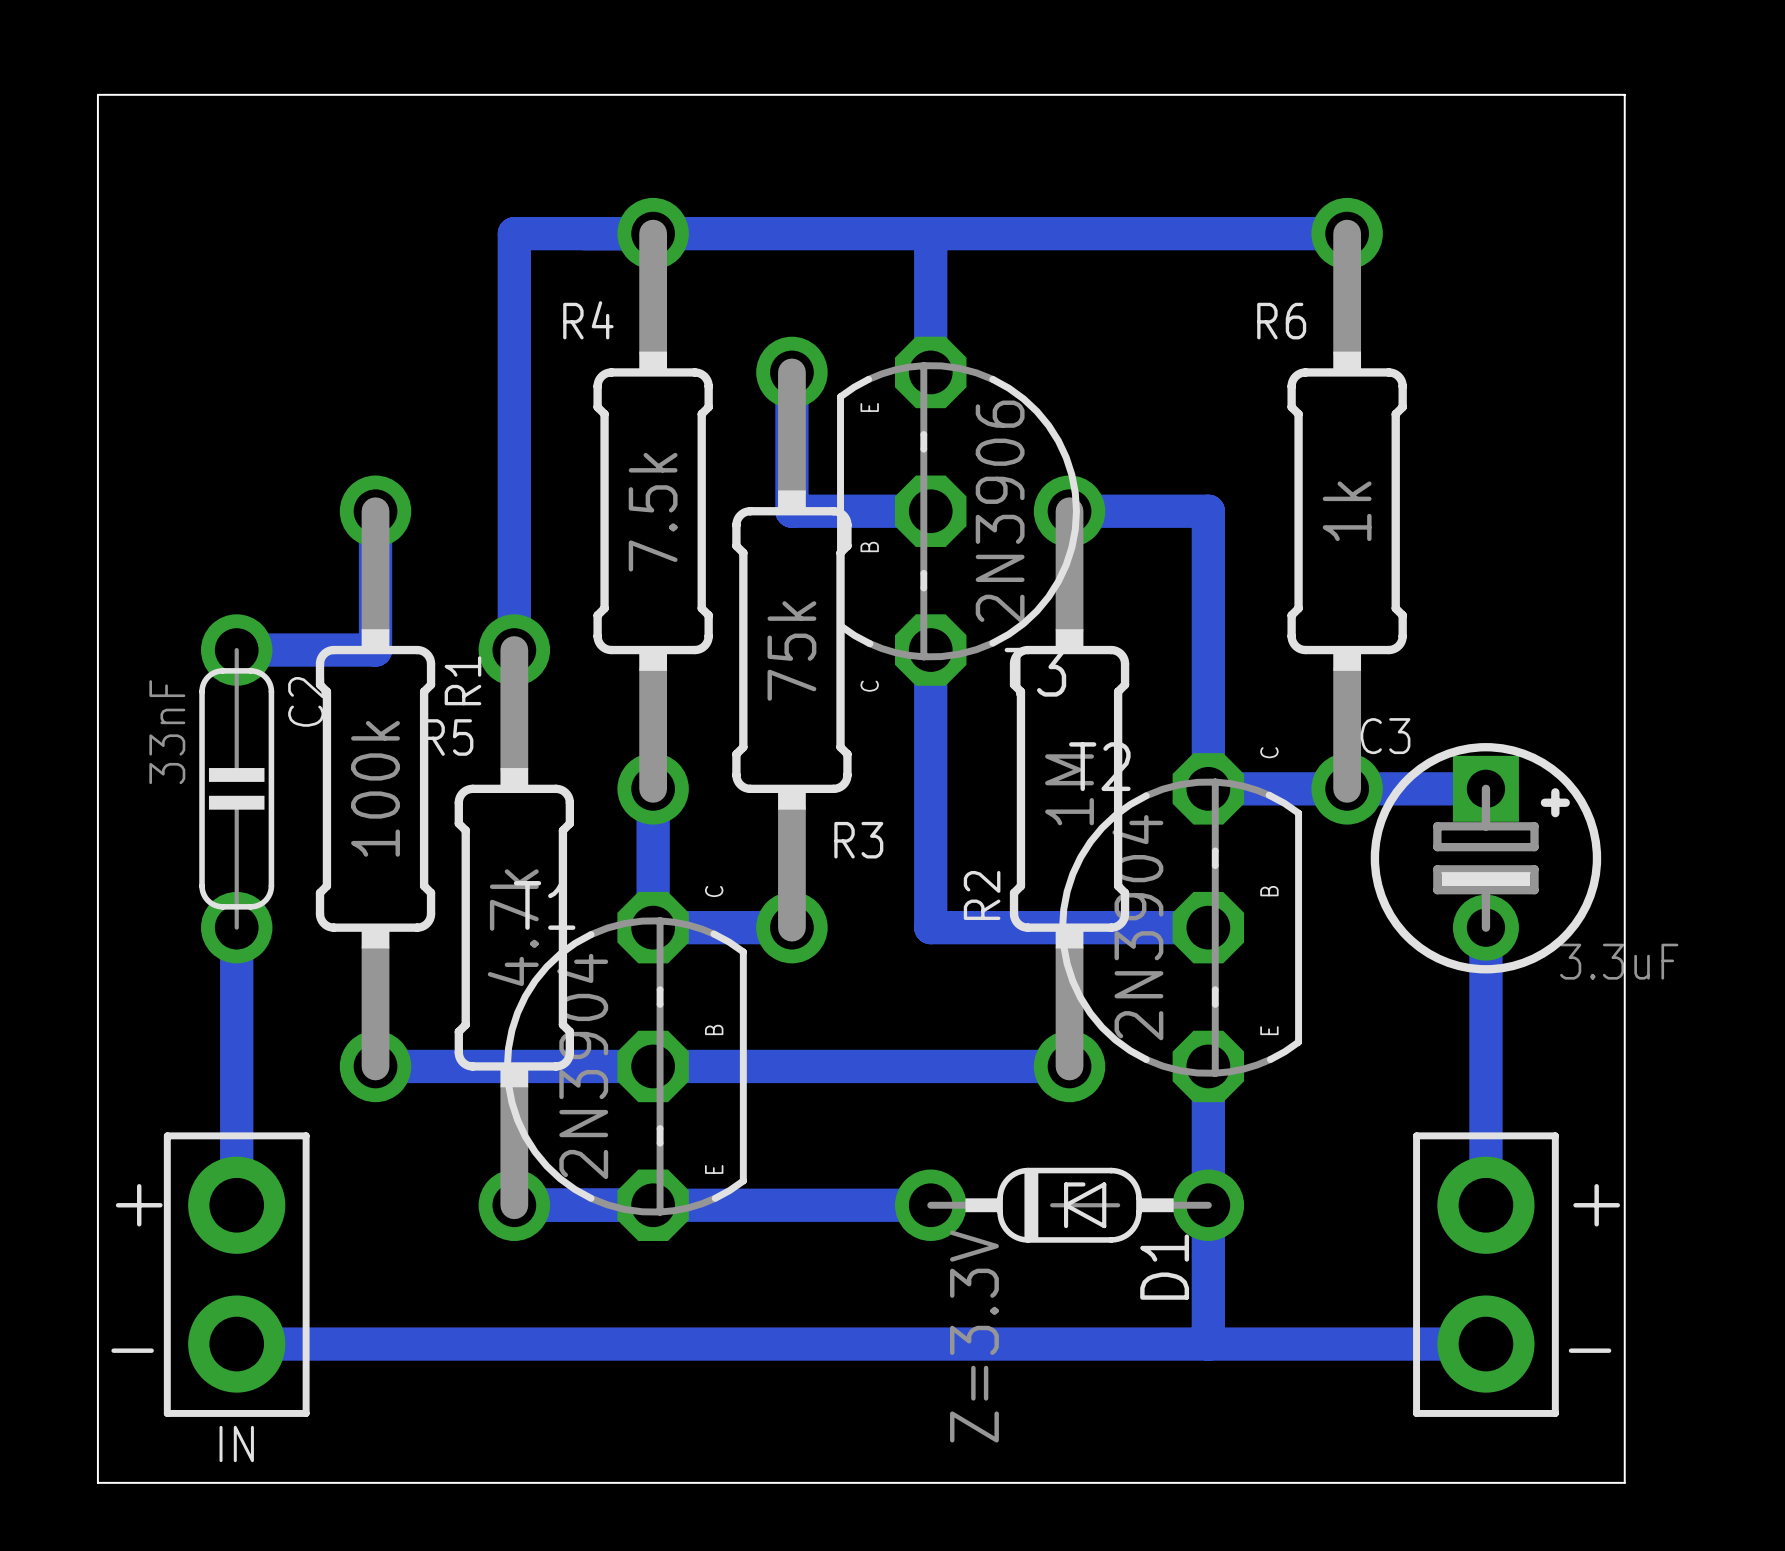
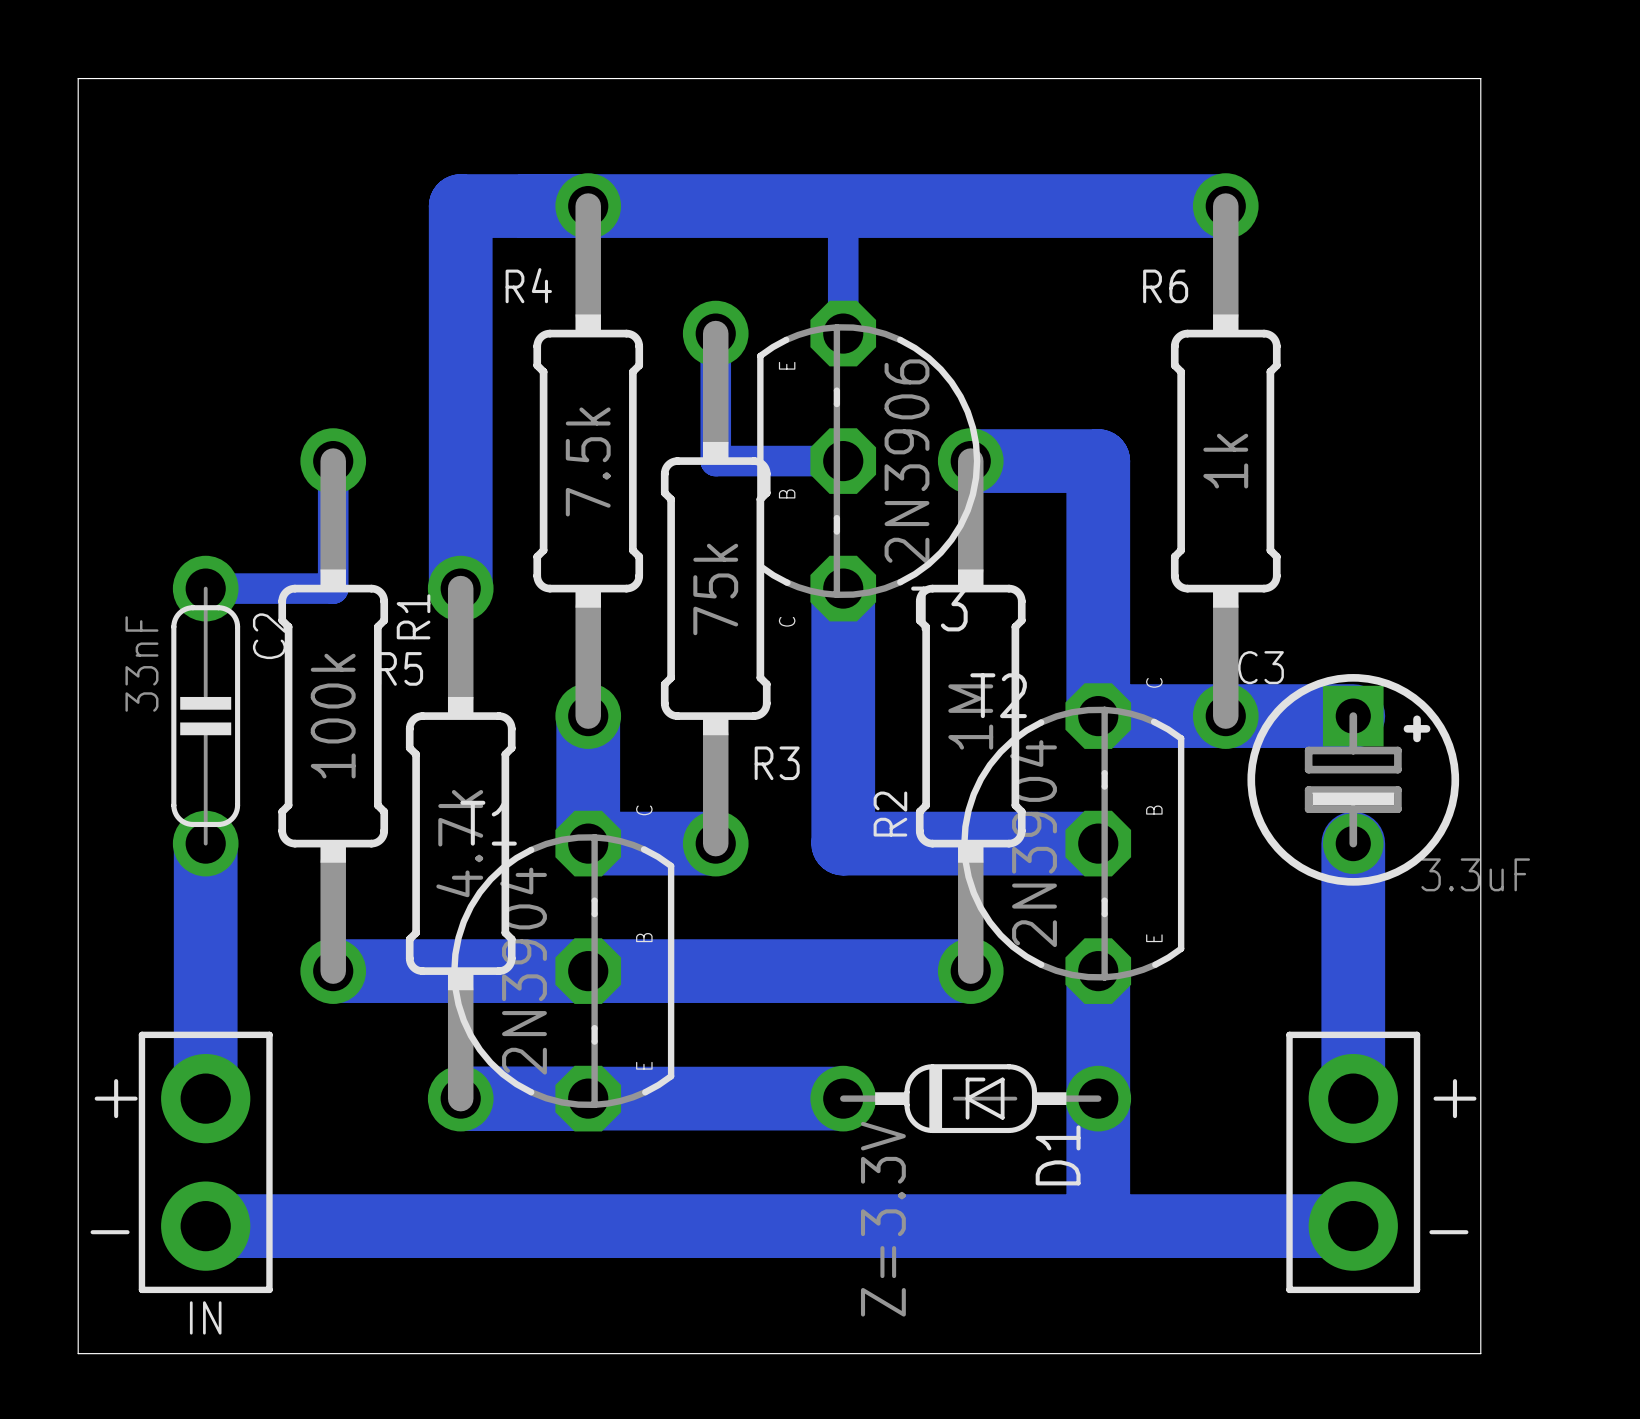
bottom track width: thin (1347, 233) (514, 233) (514, 650) -> thick (1225, 206) (460, 206) (460, 588)
bottom track width: thin (1069, 511) (1208, 511) (1208, 788) (1485, 788) -> thick (970, 461) (1098, 461) (1098, 716) (1353, 716)
bottom track width: thin (930, 650) (930, 927) (1208, 927) -> thick (843, 588) (843, 843) (1098, 843)
bottom track width: thin (653, 788) (653, 927) (791, 927) -> thick (588, 716) (588, 843) (715, 843)
bottom track width: thin (236, 927) (236, 1205) -> thick (205, 843) (205, 1098)
bottom track width: thin (1485, 927) (1485, 1205) -> thick (1353, 843) (1353, 1098)
bottom track width: thin (375, 1066) (1069, 1066) -> thick (333, 971) (970, 971)
bottom track width: thin (1208, 1066) (1208, 1344) -> thick (1098, 971) (1098, 1226)
bottom track width: thin (514, 1205) (930, 1205) -> thick (460, 1098) (843, 1098)
bottom track width: thin (236, 1344) (1485, 1344) -> thick (205, 1226) (1353, 1226)

